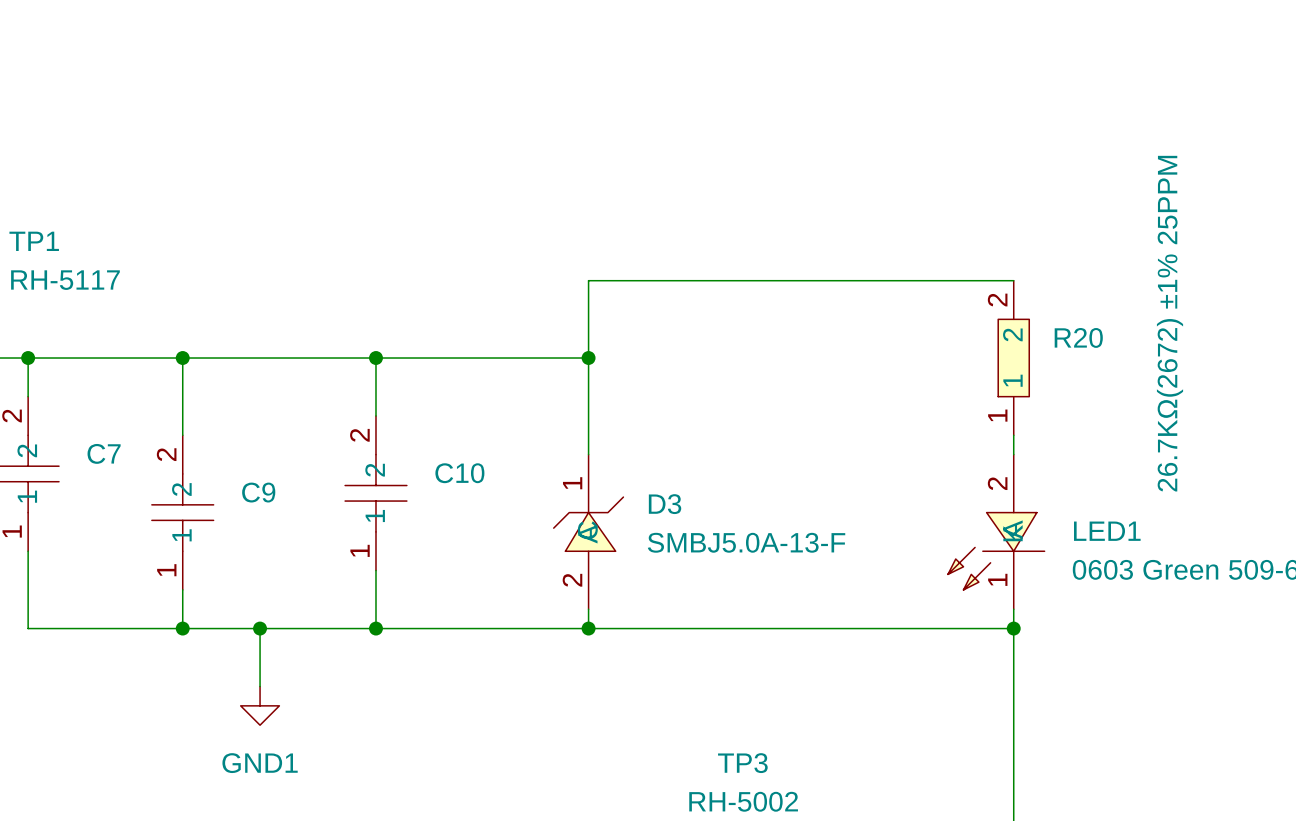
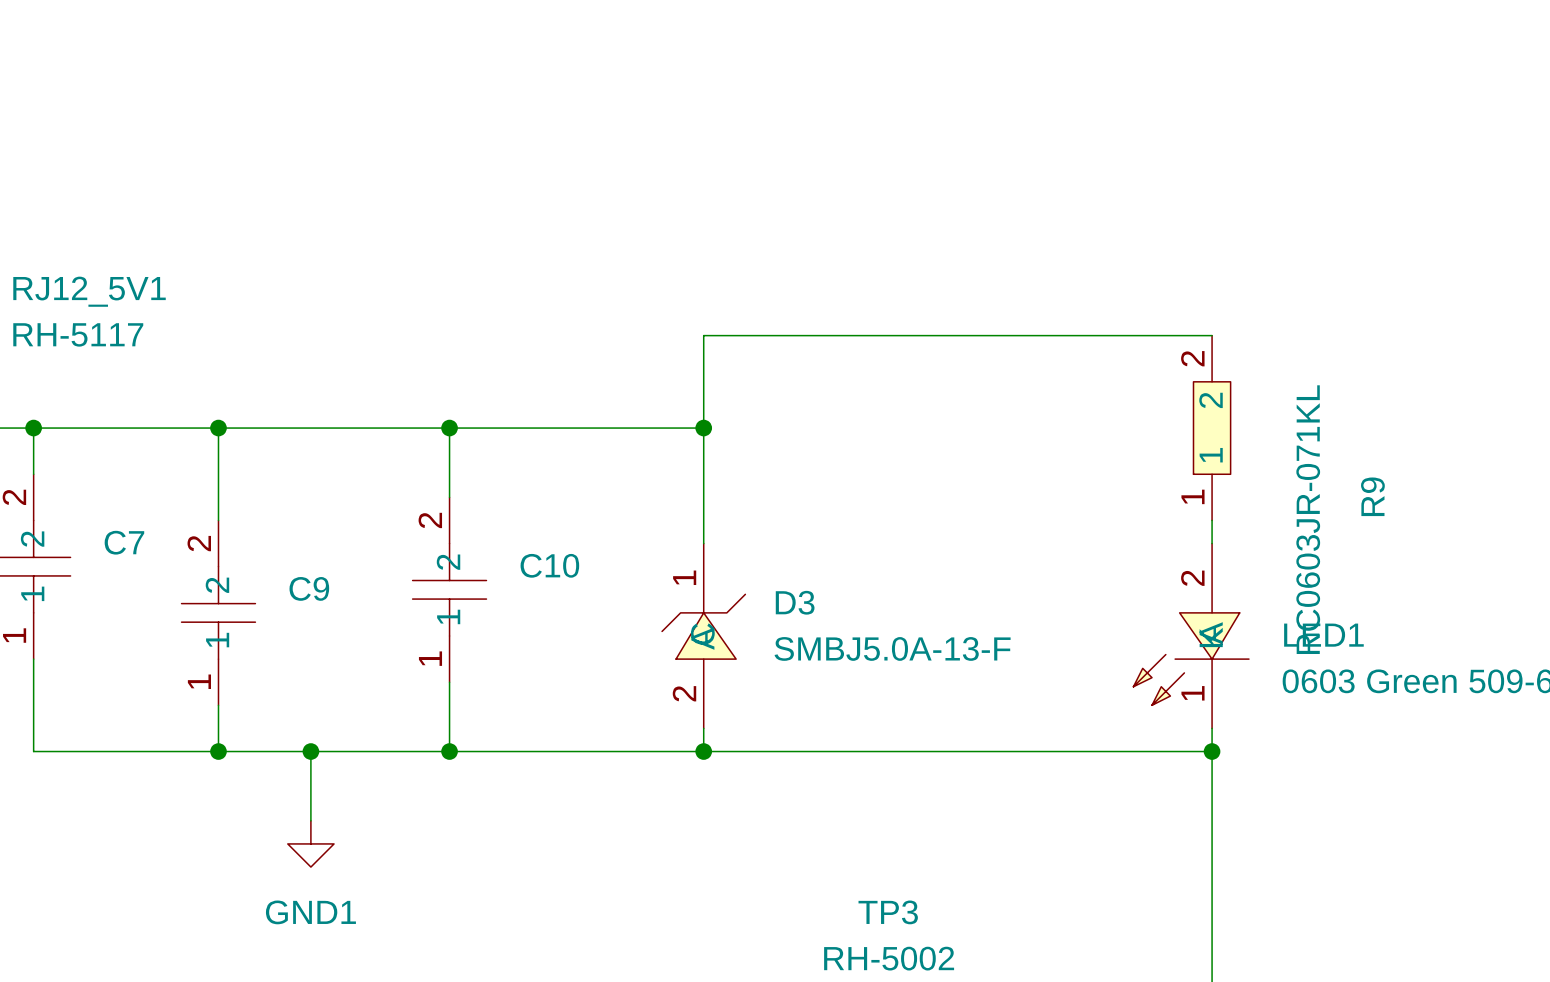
TP1 name: TP1 (34, 241) -> RJ12_5V1 (89, 291)
R20 text: 26.7KΩ(2672) ±1% 25PPM (1170, 323) -> none
R20 name: R20 (1078, 337) -> R9 (1372, 496)
R20 value: none -> RC0603JR-071KL (1308, 519)

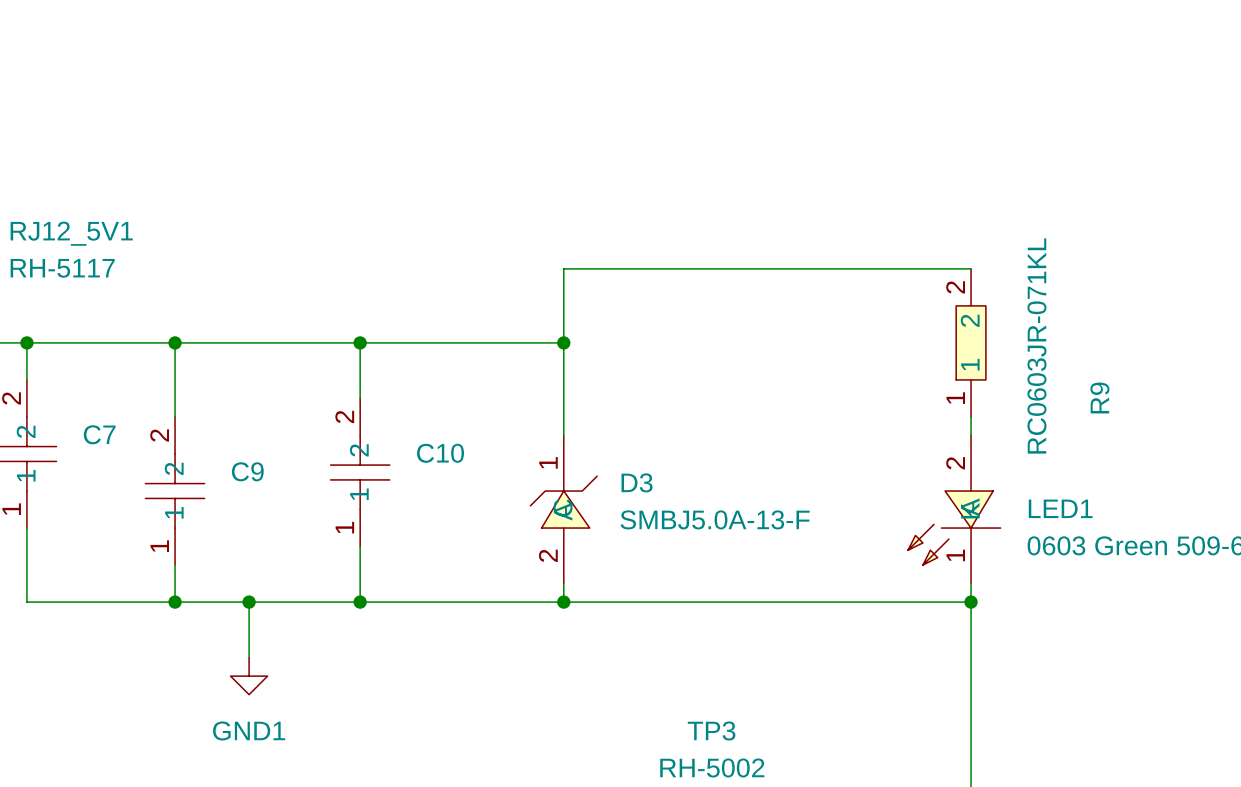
R9 value position: RC0603JR-071KL (1308, 519) -> RC0603JR-071KL (1036, 345)

